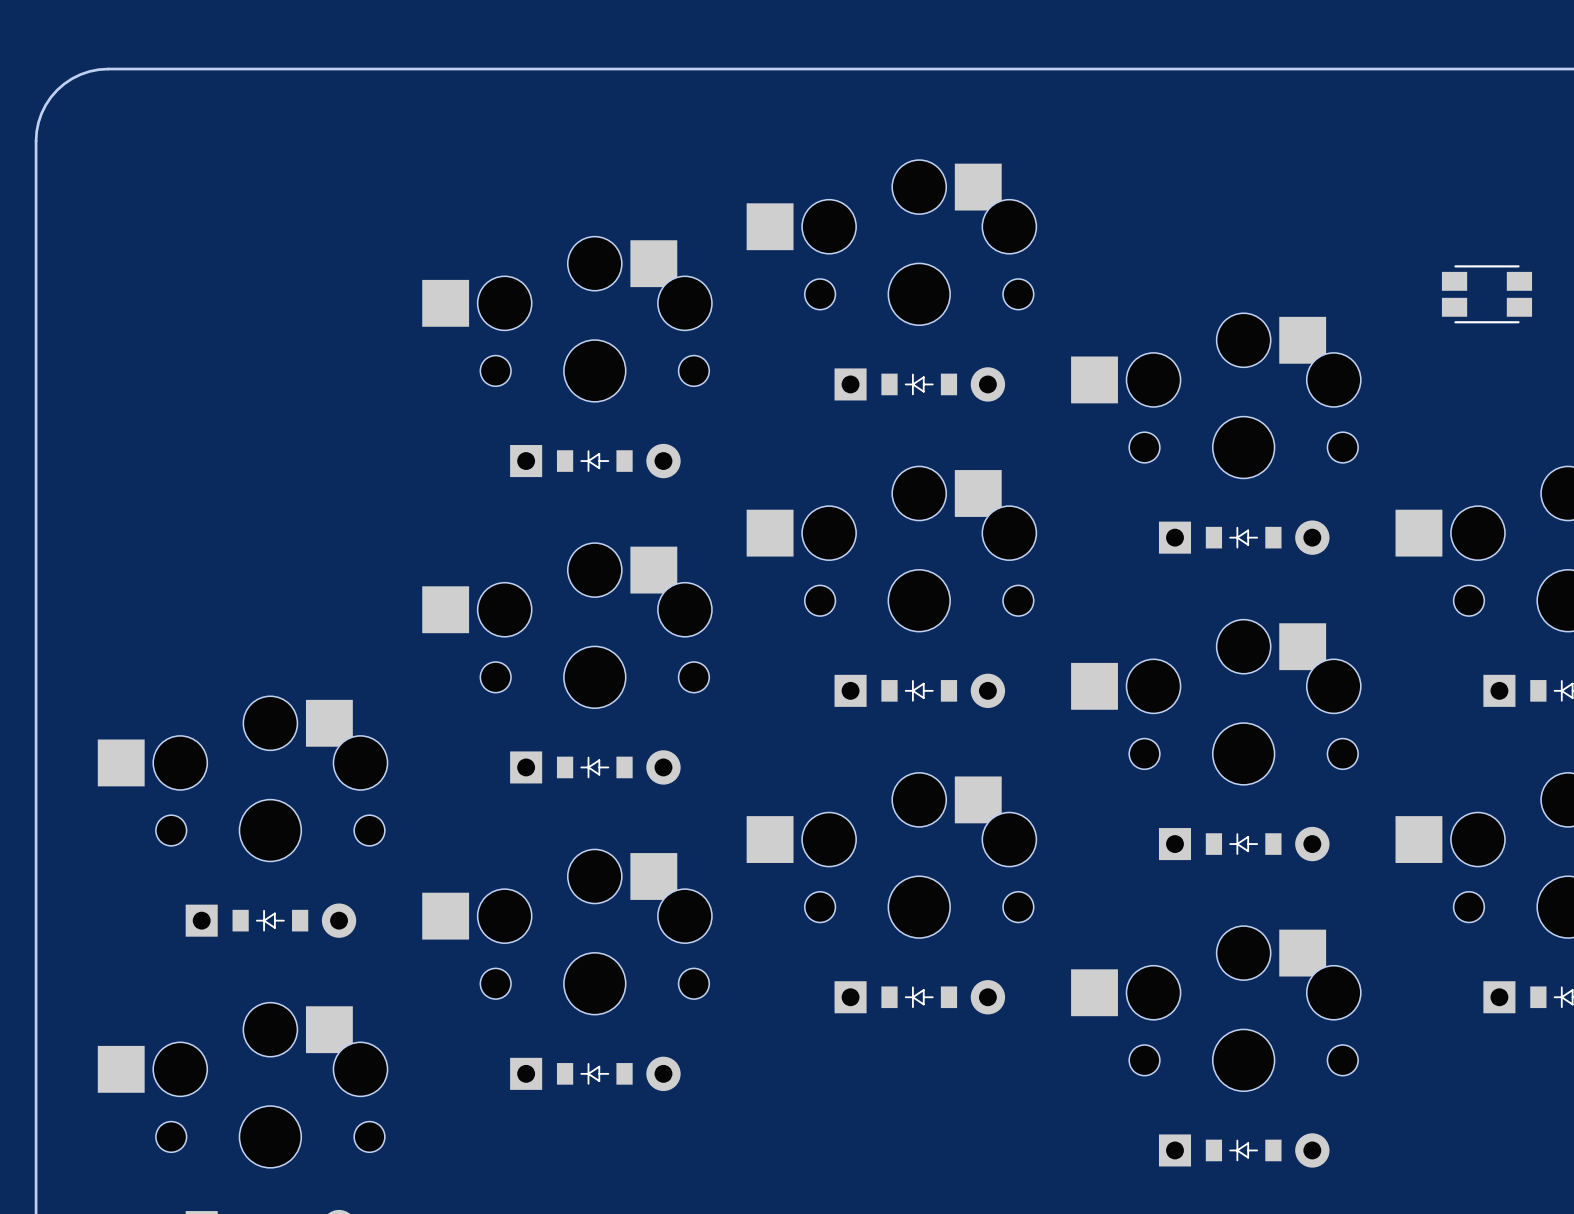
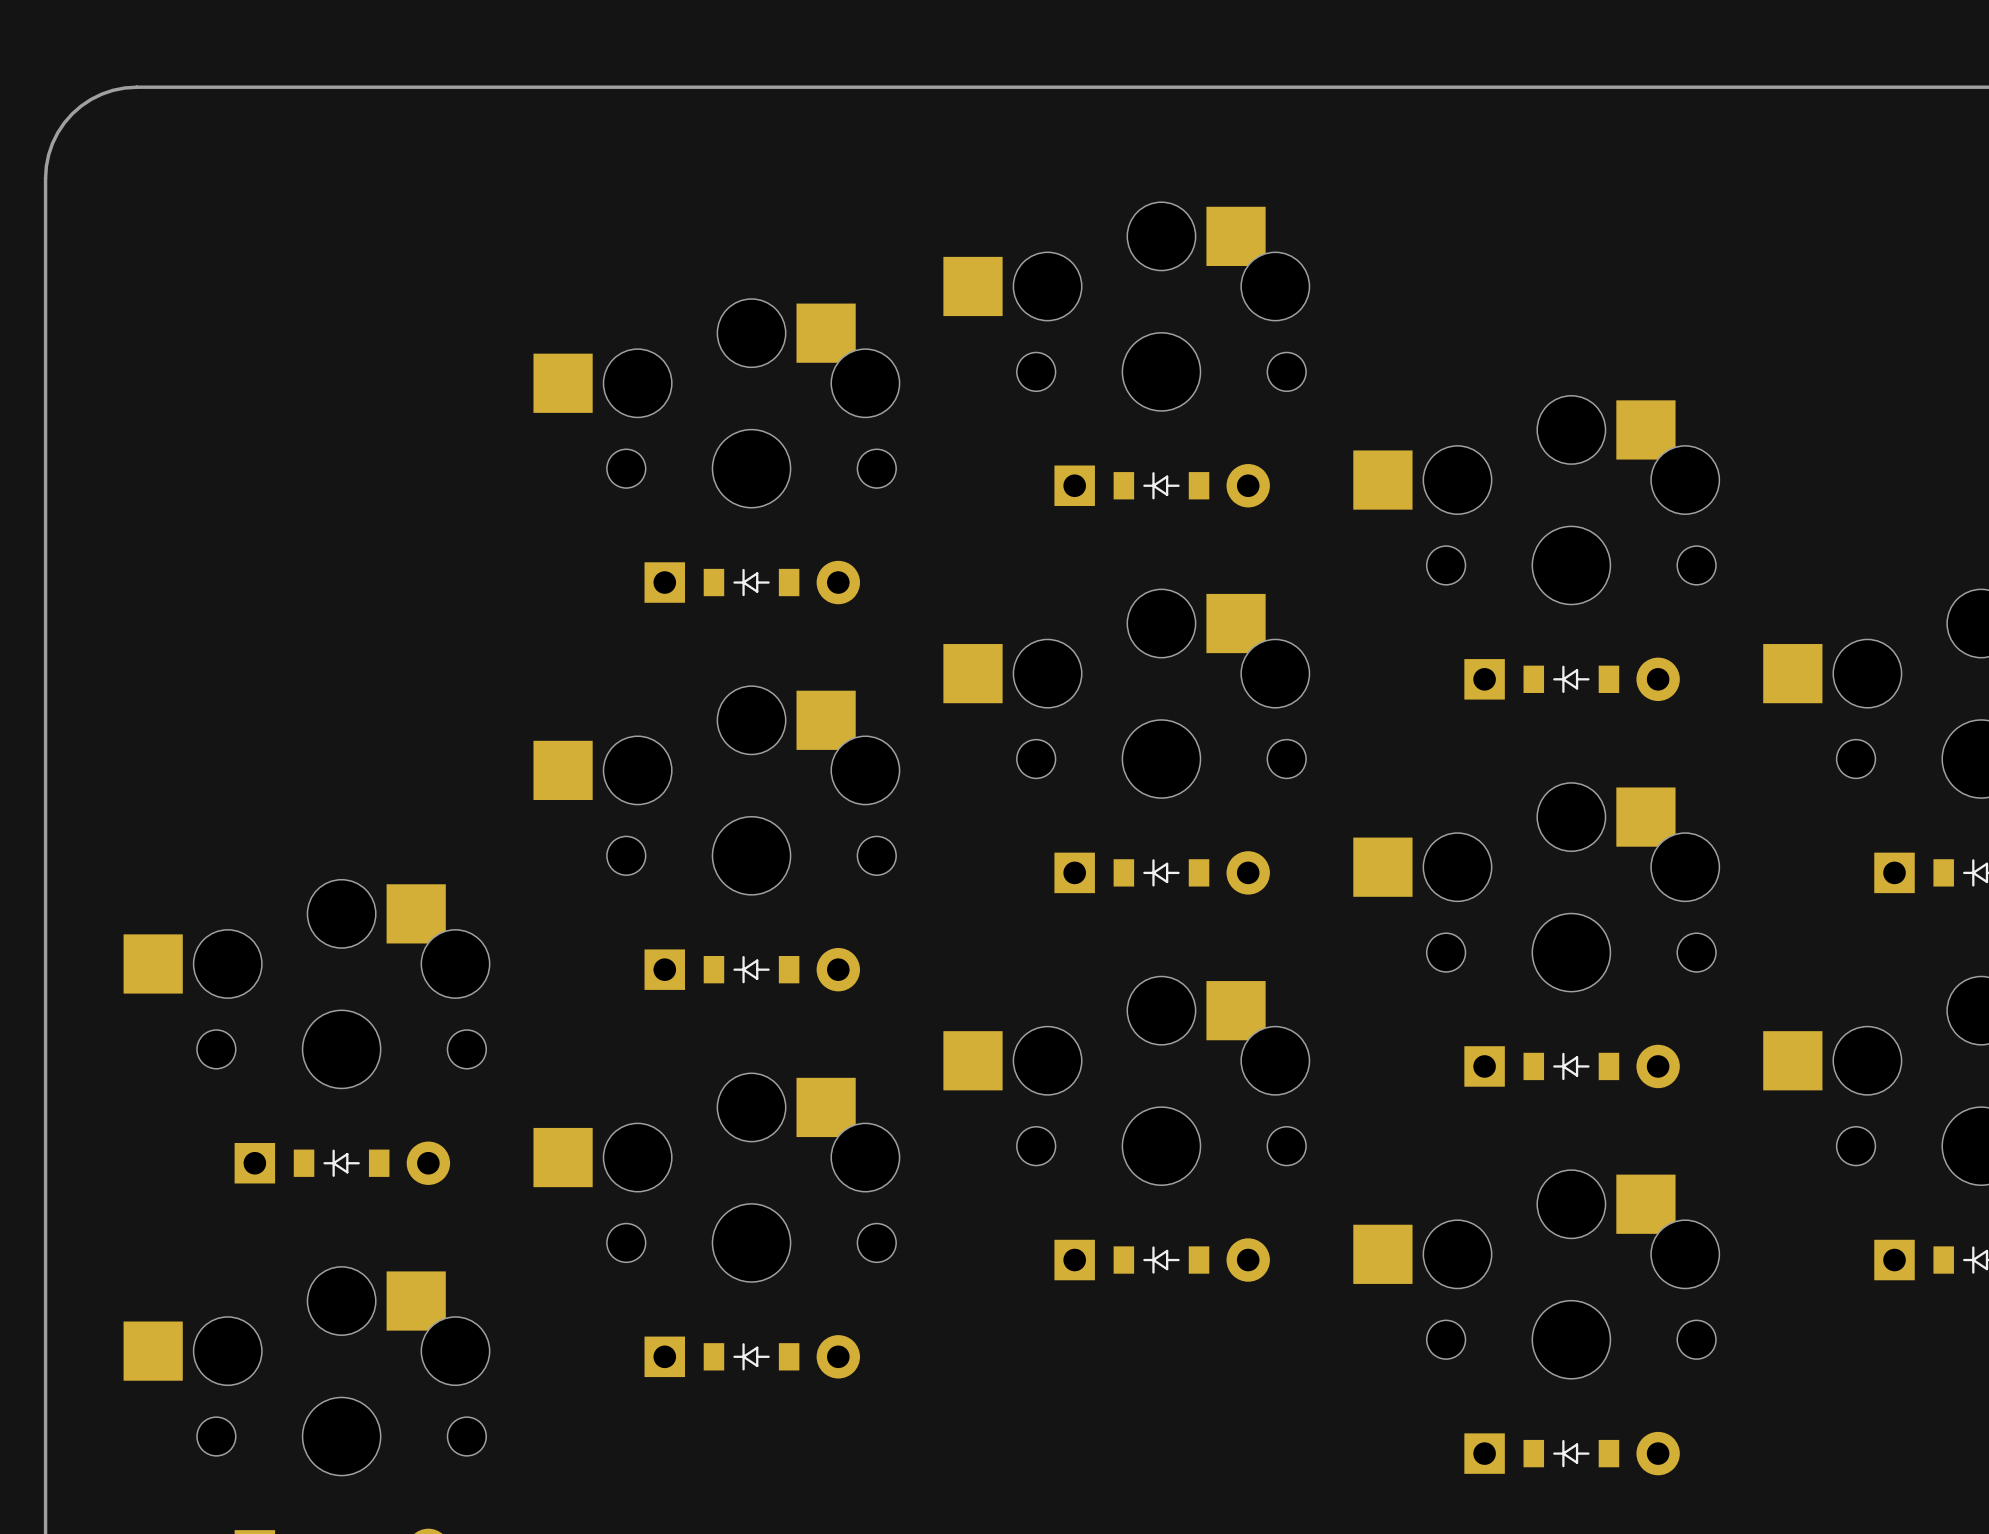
part: (1486, 294) -> none

